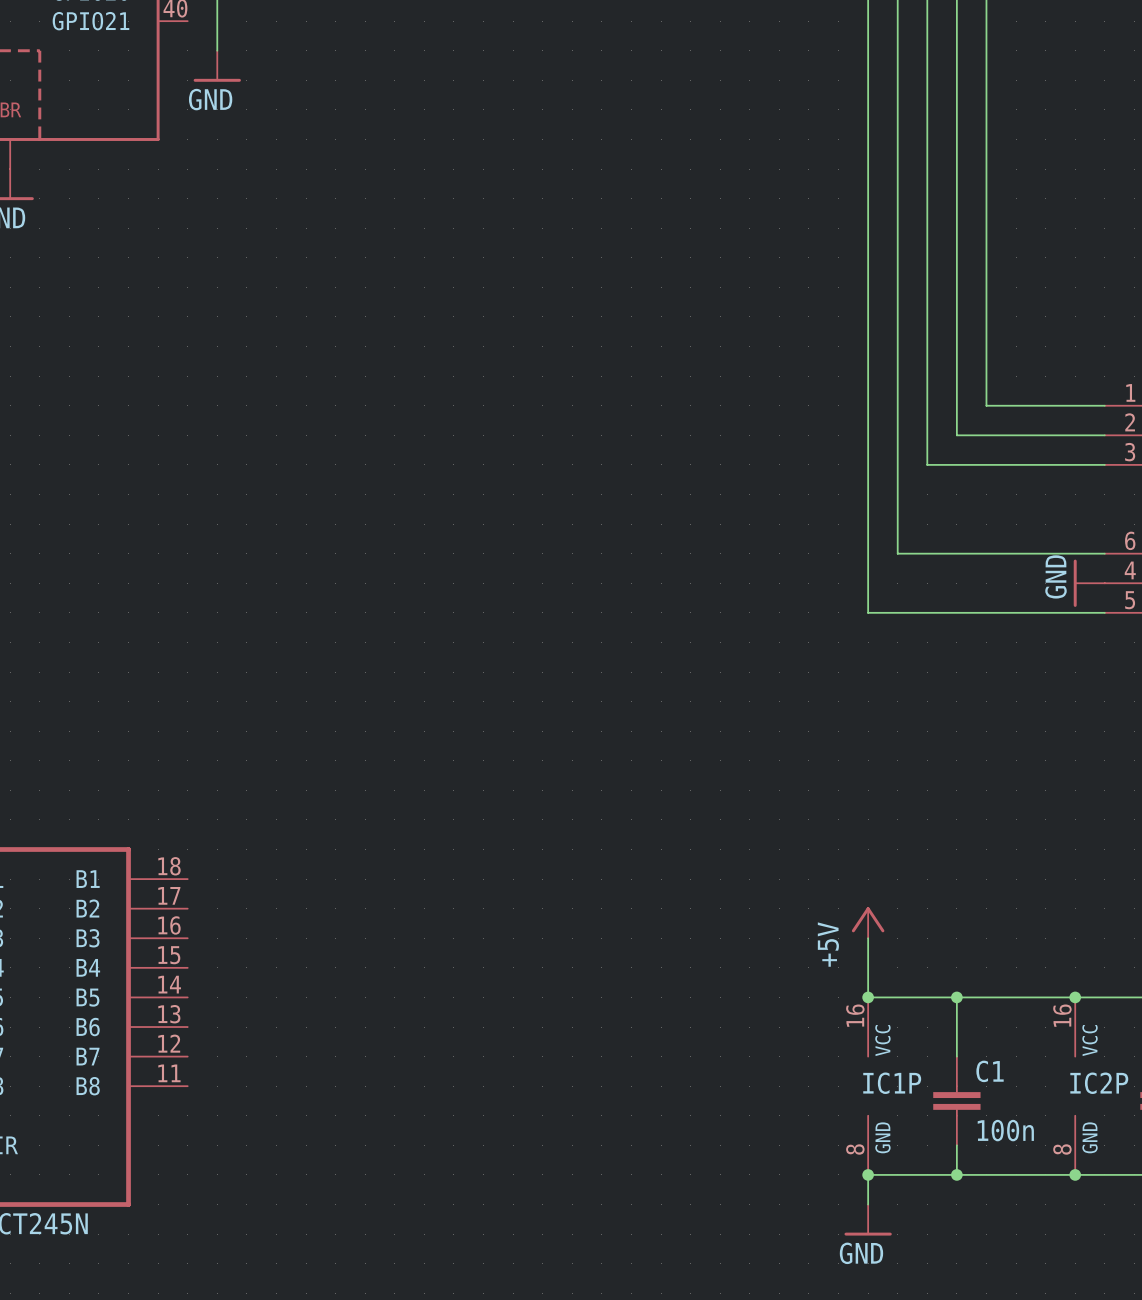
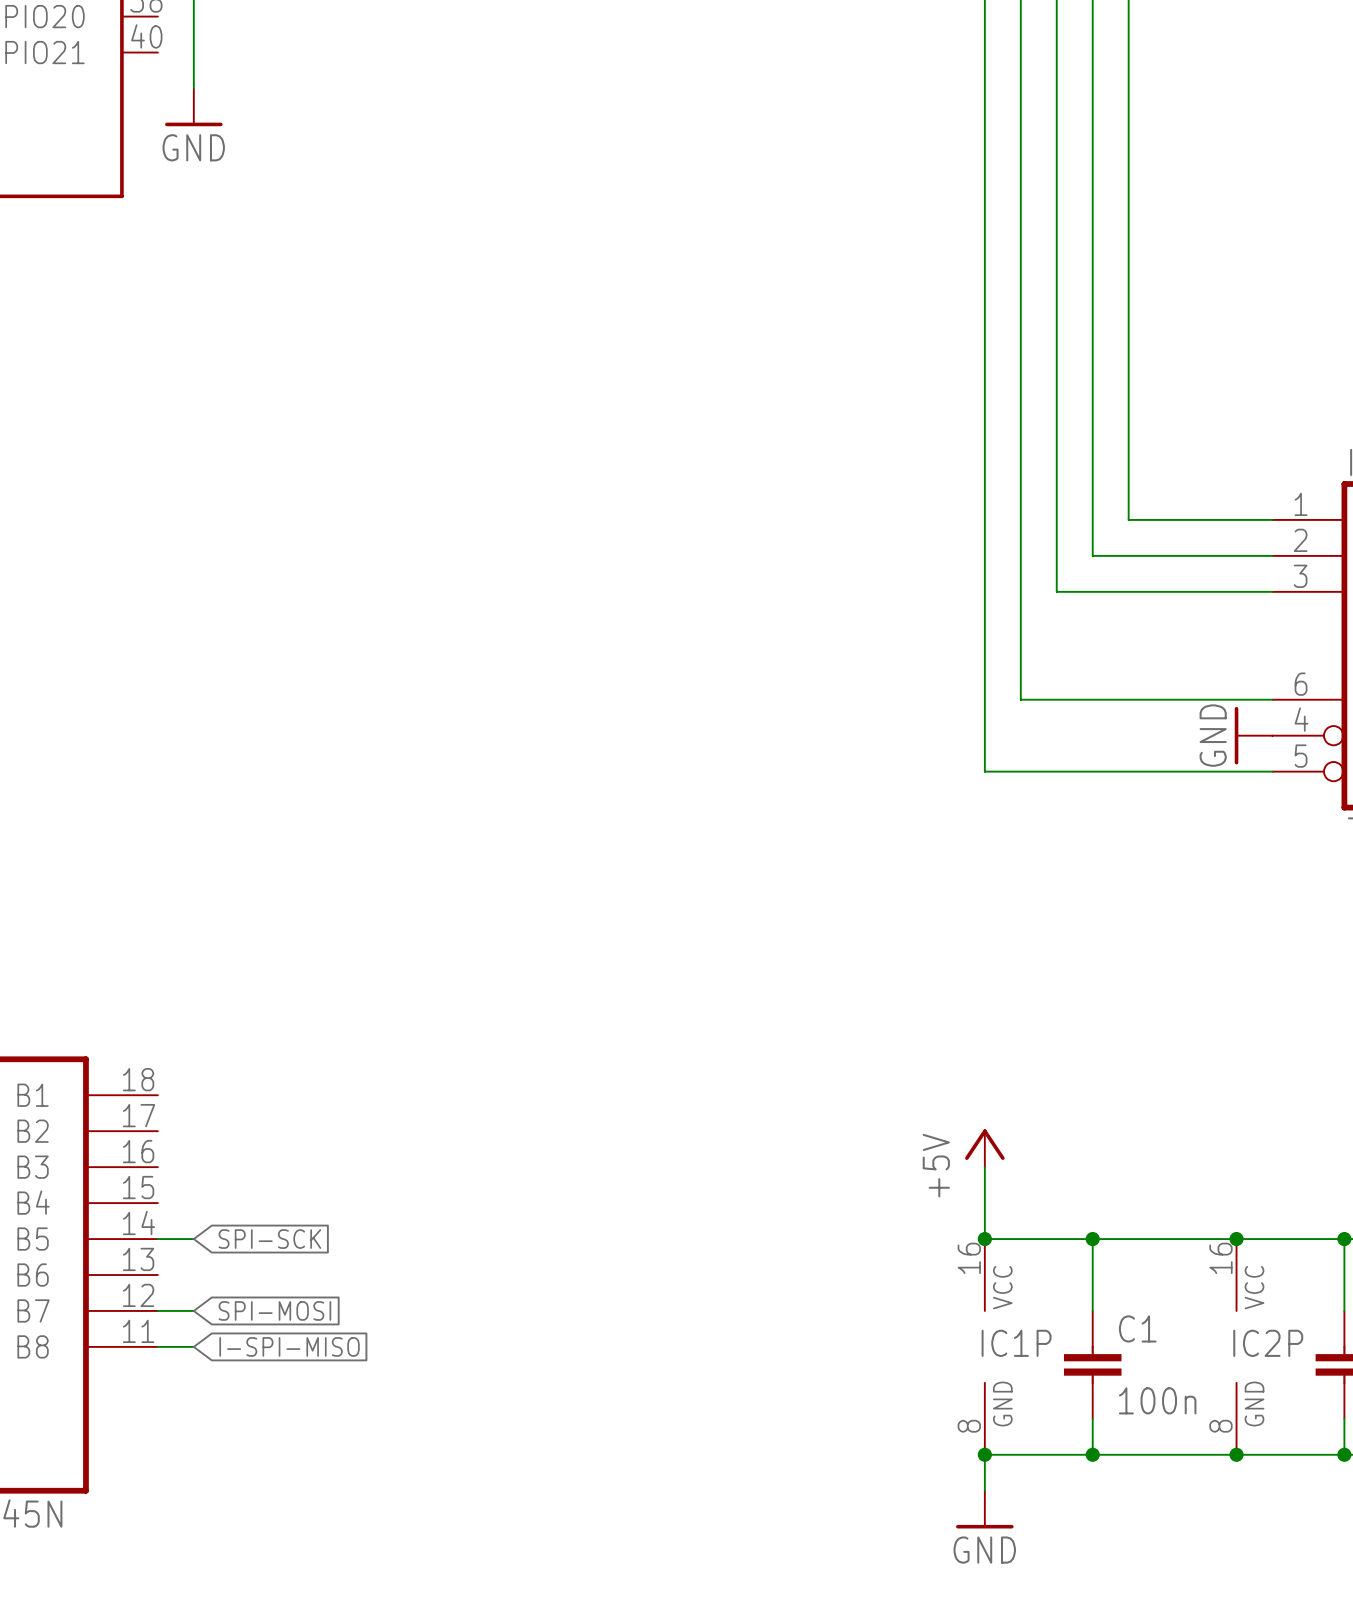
wire: none -> (157, 1239) (193, 1239)
global label: none -> SPI-SCK (269, 1239)
wire: none -> (157, 1310) (193, 1310)
global label: none -> SPI-MOSI (274, 1310)
wire: none -> (157, 1346) (193, 1346)
global label: none -> I-SPI-MISO (289, 1346)

